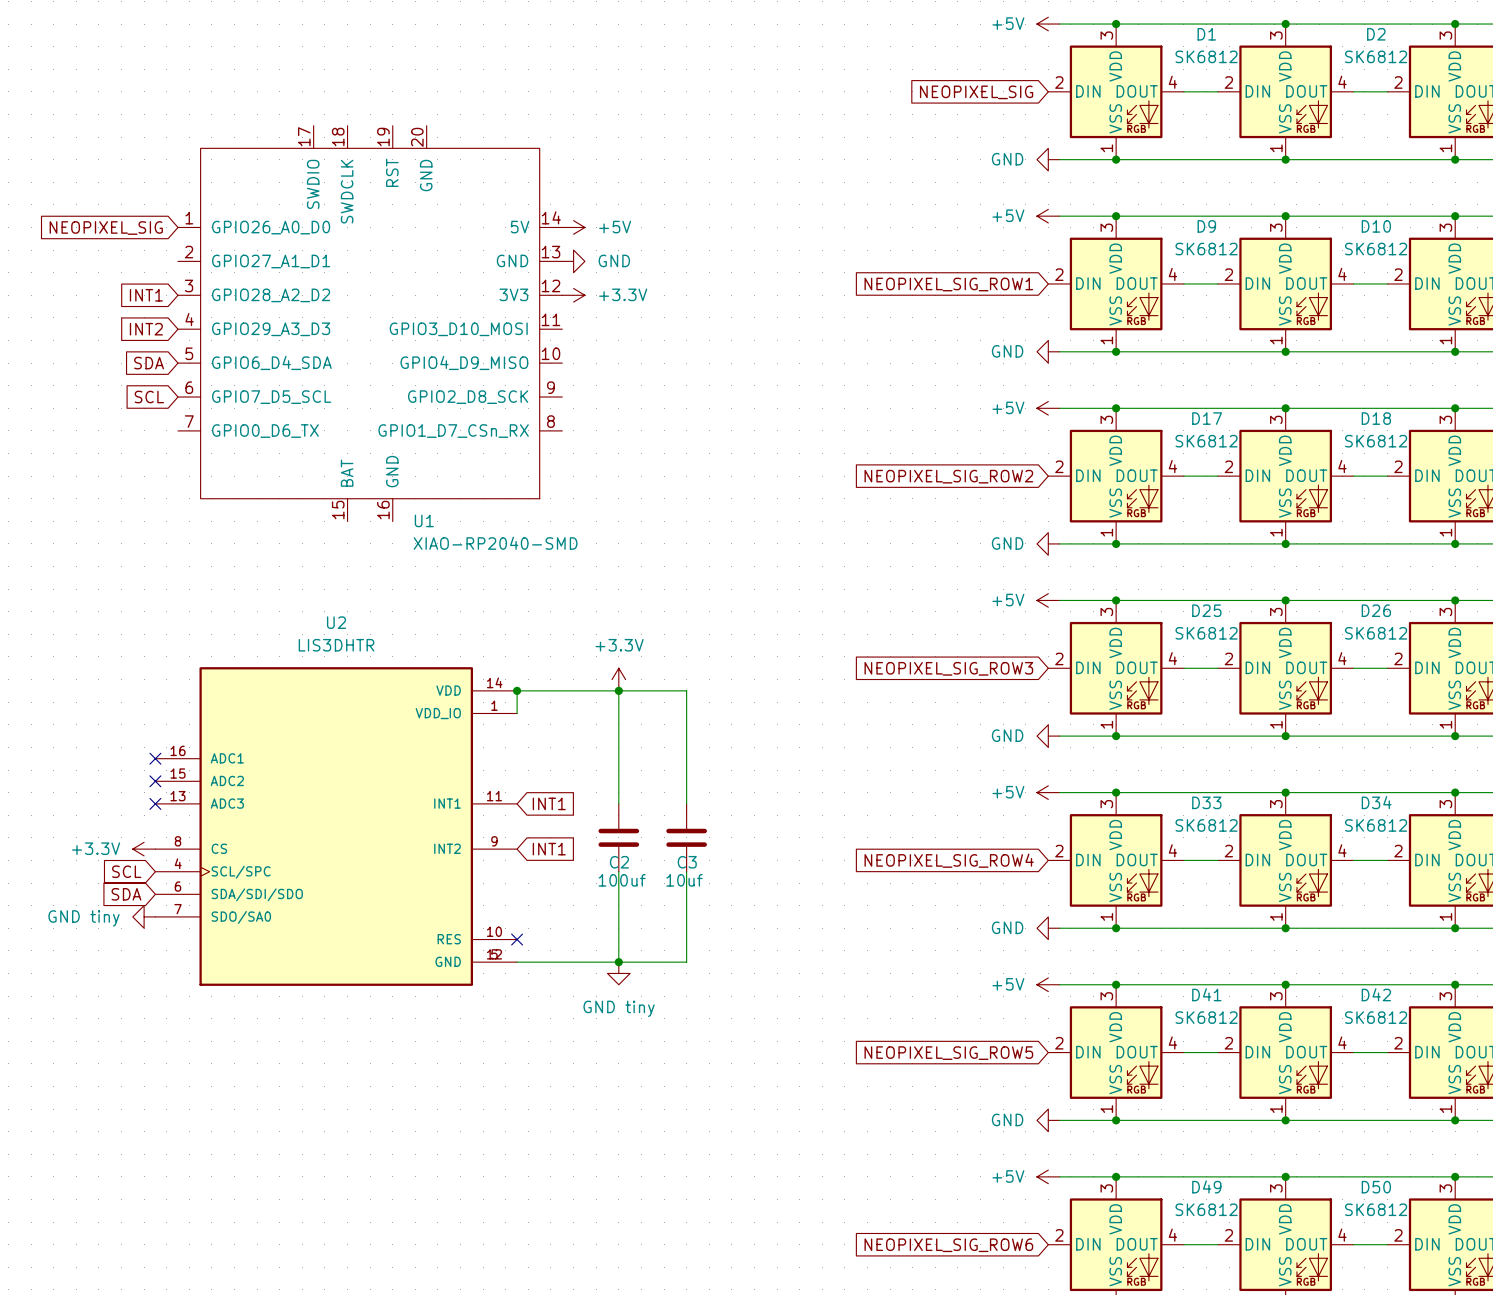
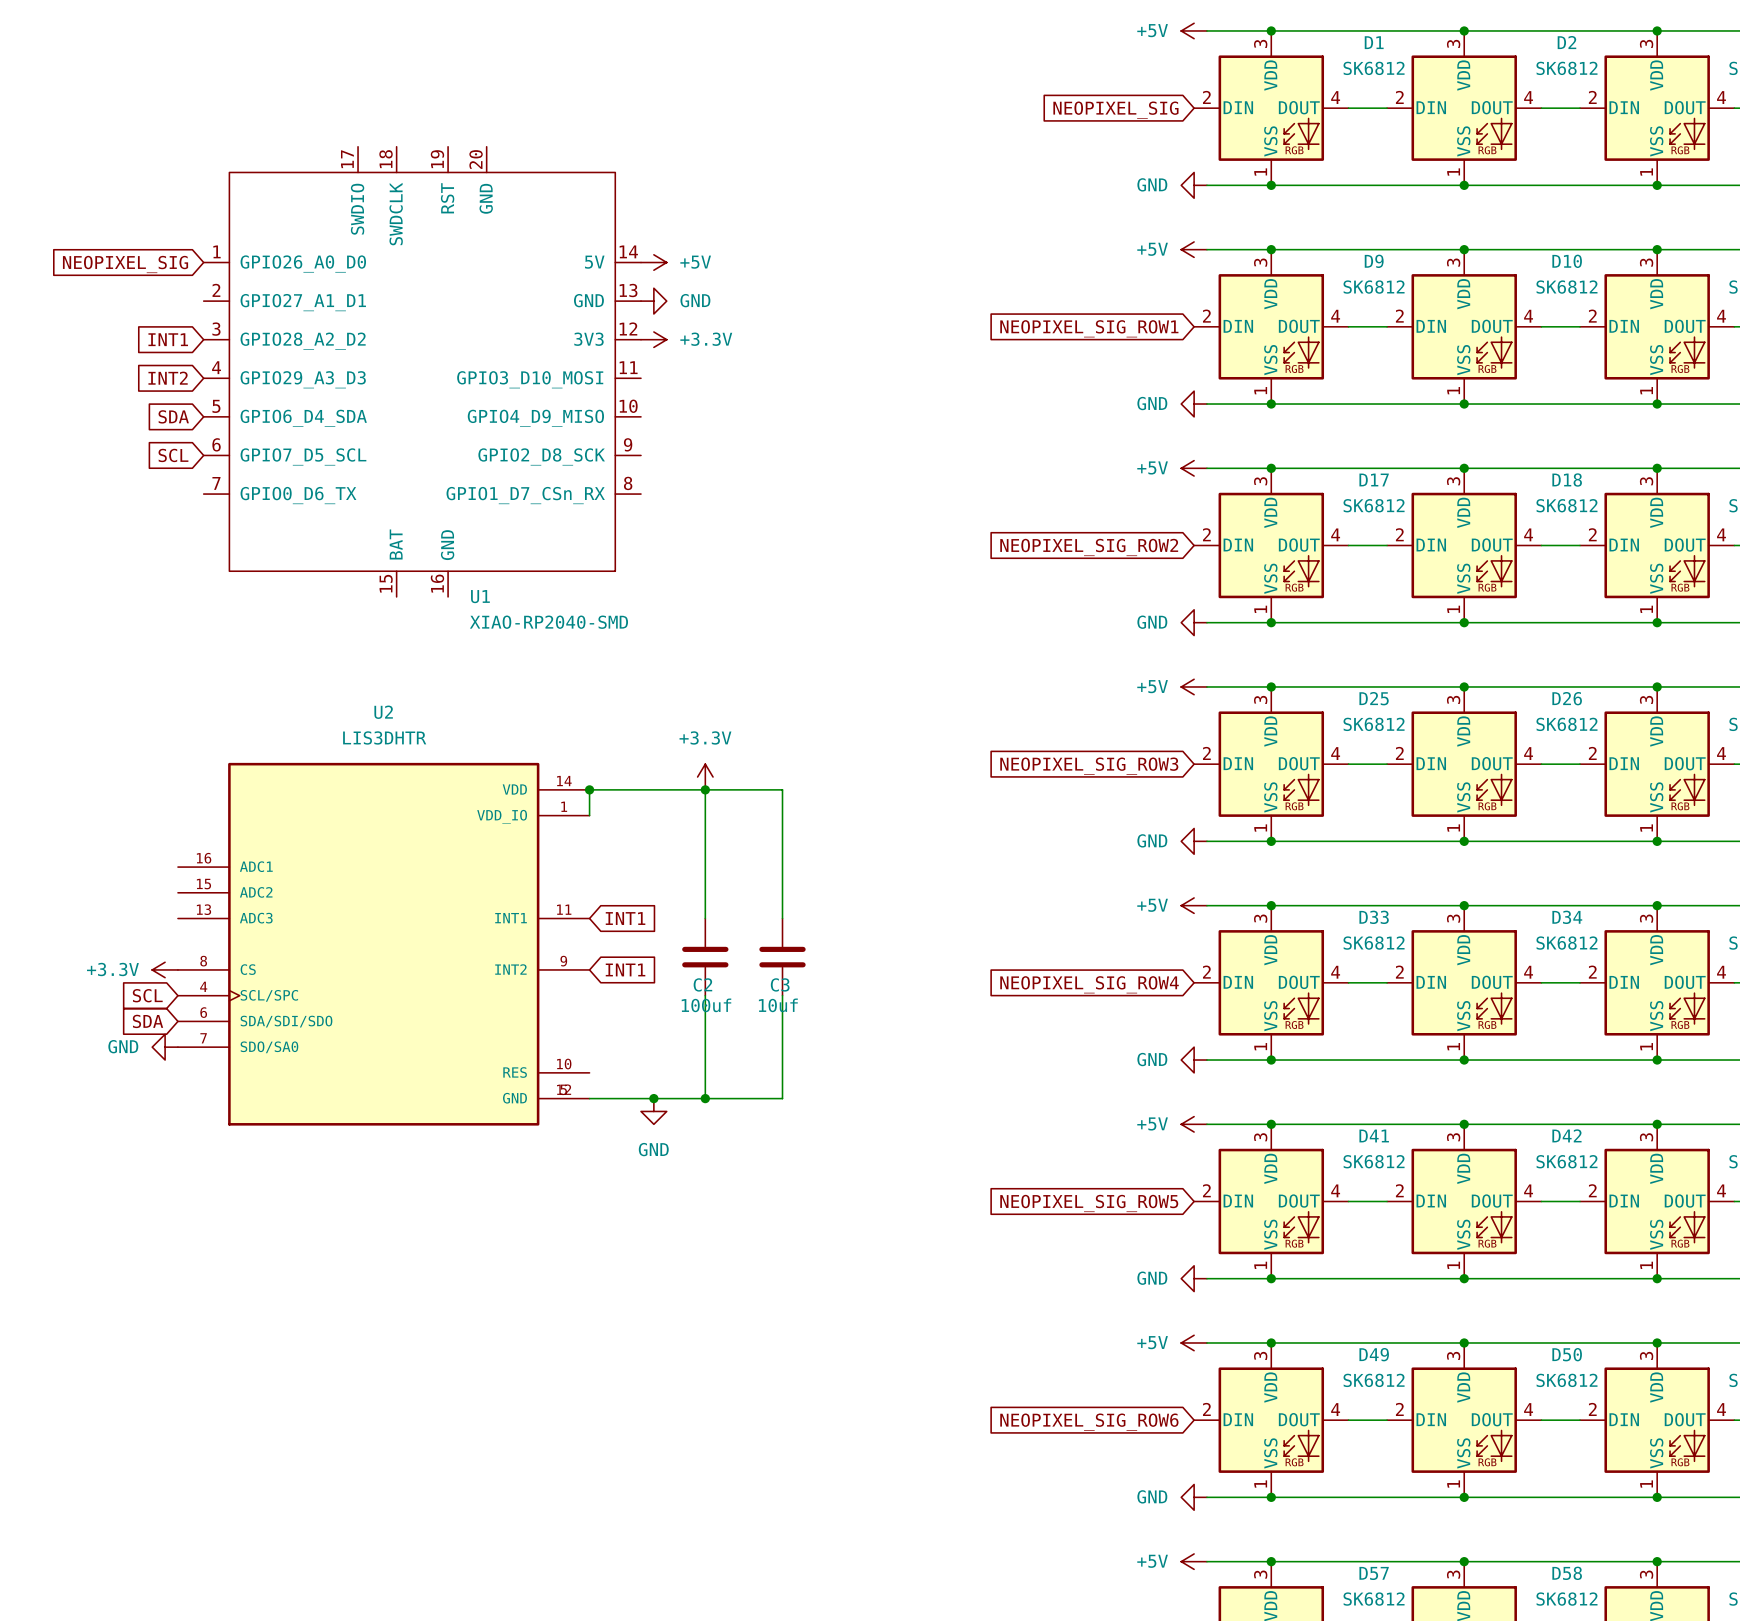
no-connect mark: (155, 758) -> none
no-connect mark: (155, 781) -> none
no-connect mark: (155, 803) -> none
power symbol: GND tiny (144, 916) -> GND (165, 1047)
no-connect mark: (517, 939) -> none
junction: none -> (653, 1098)
power symbol: none -> GND (653, 1111)
power symbol: GND tiny (618, 973) -> none

